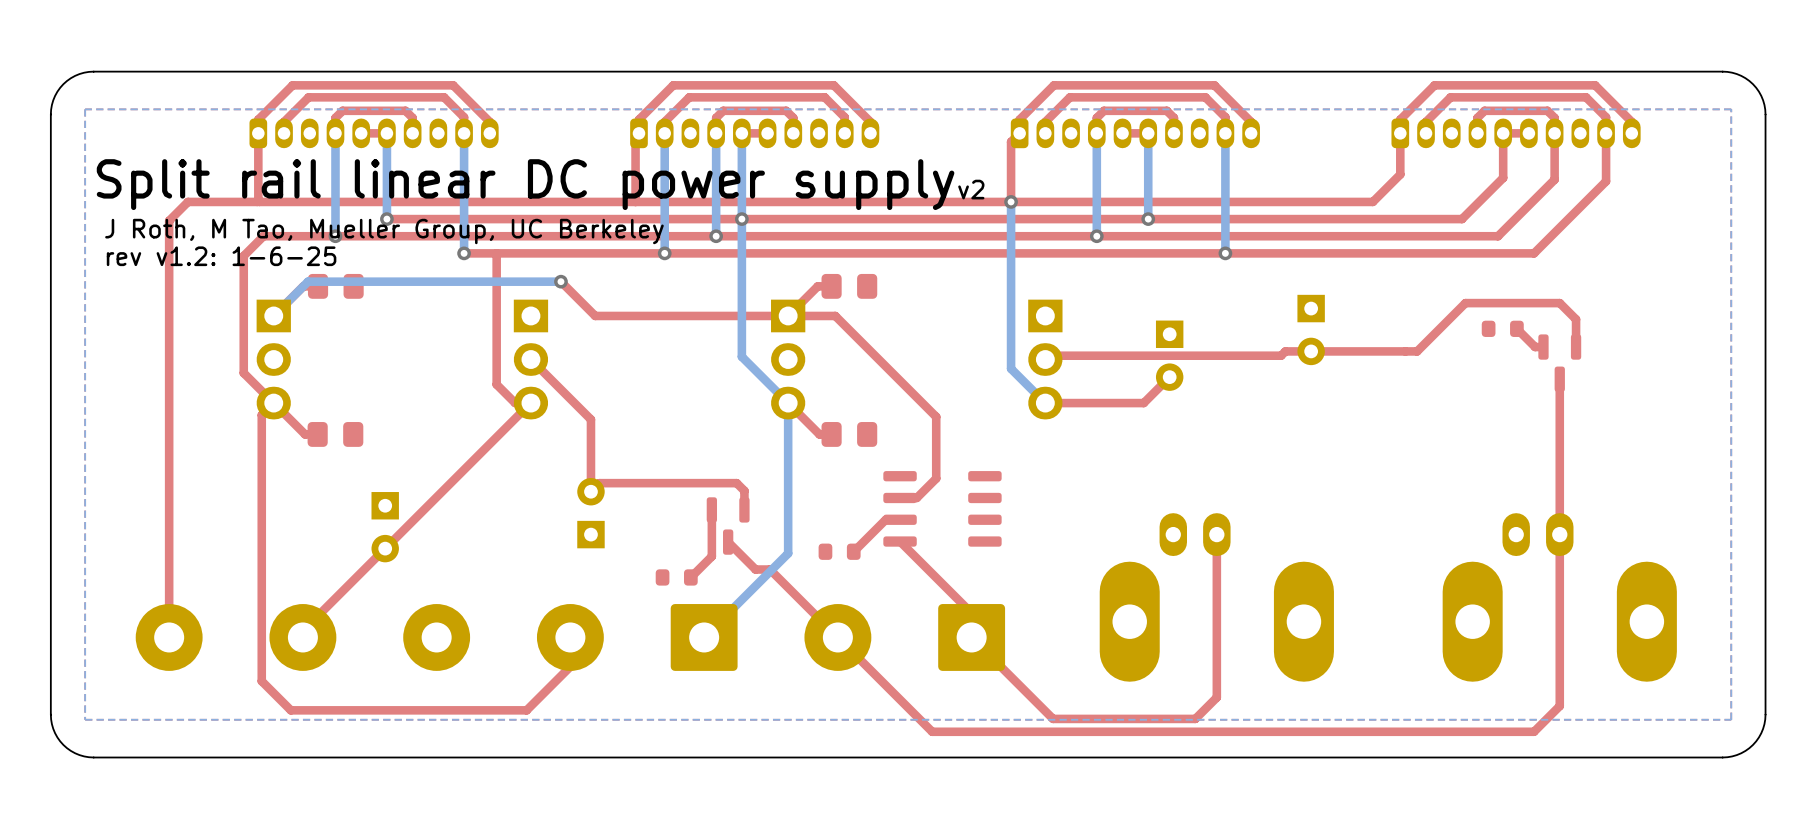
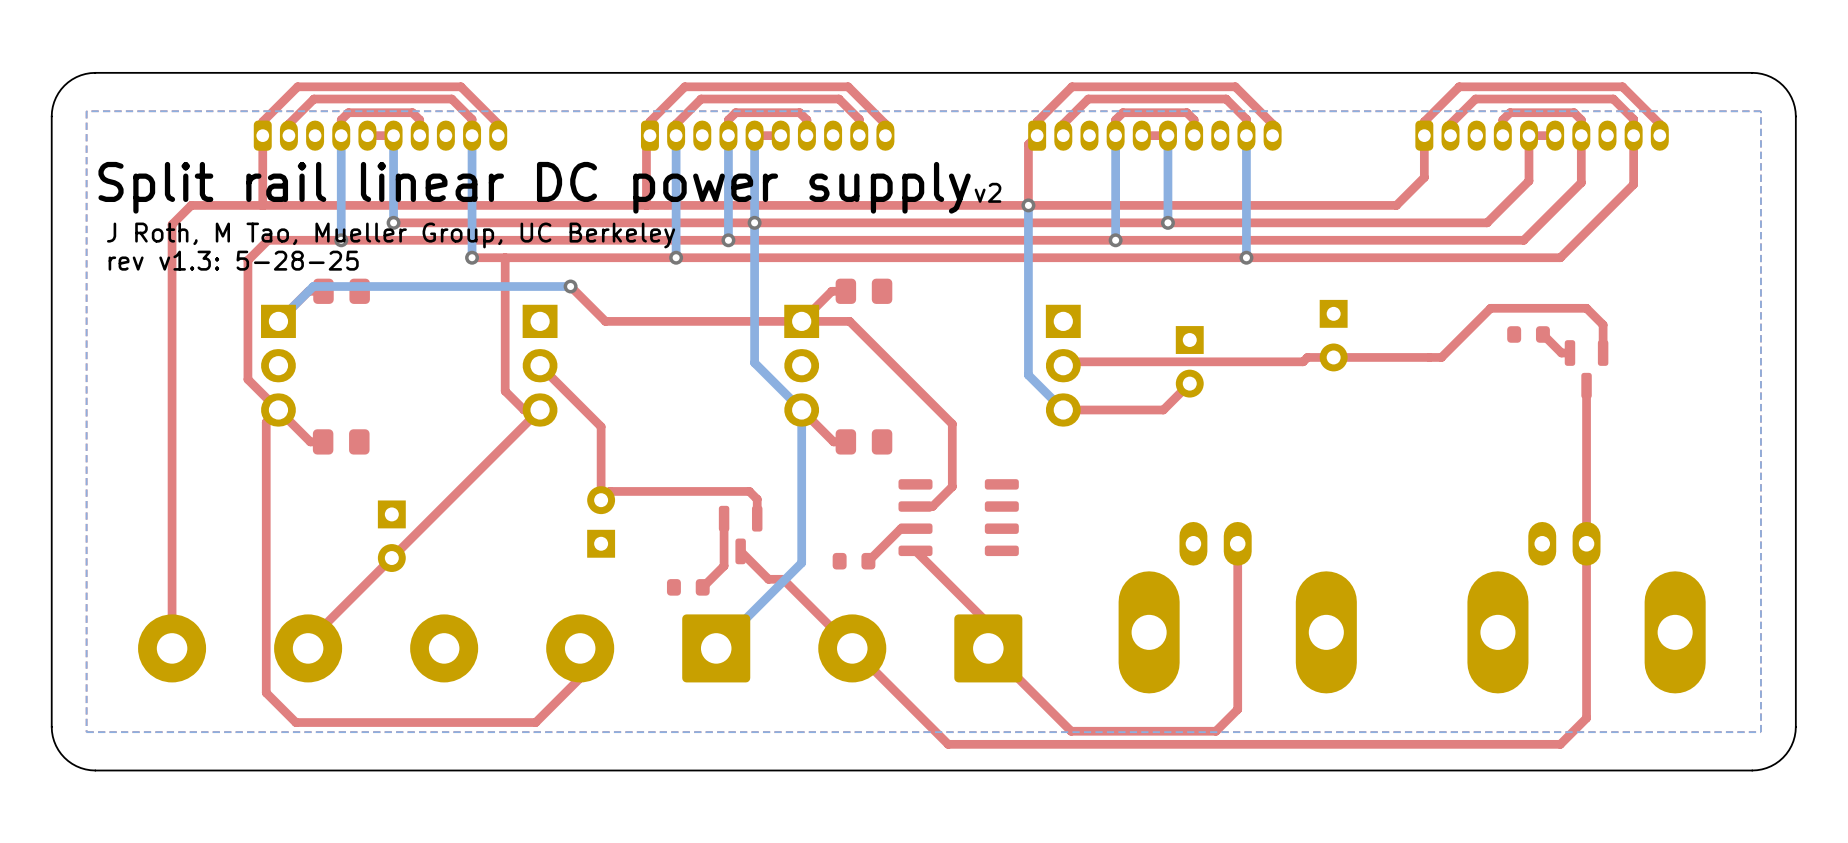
text: rev v1.2: 1-6-25 (221, 256) -> rev v1.3: 5-28-25 (233, 260)

